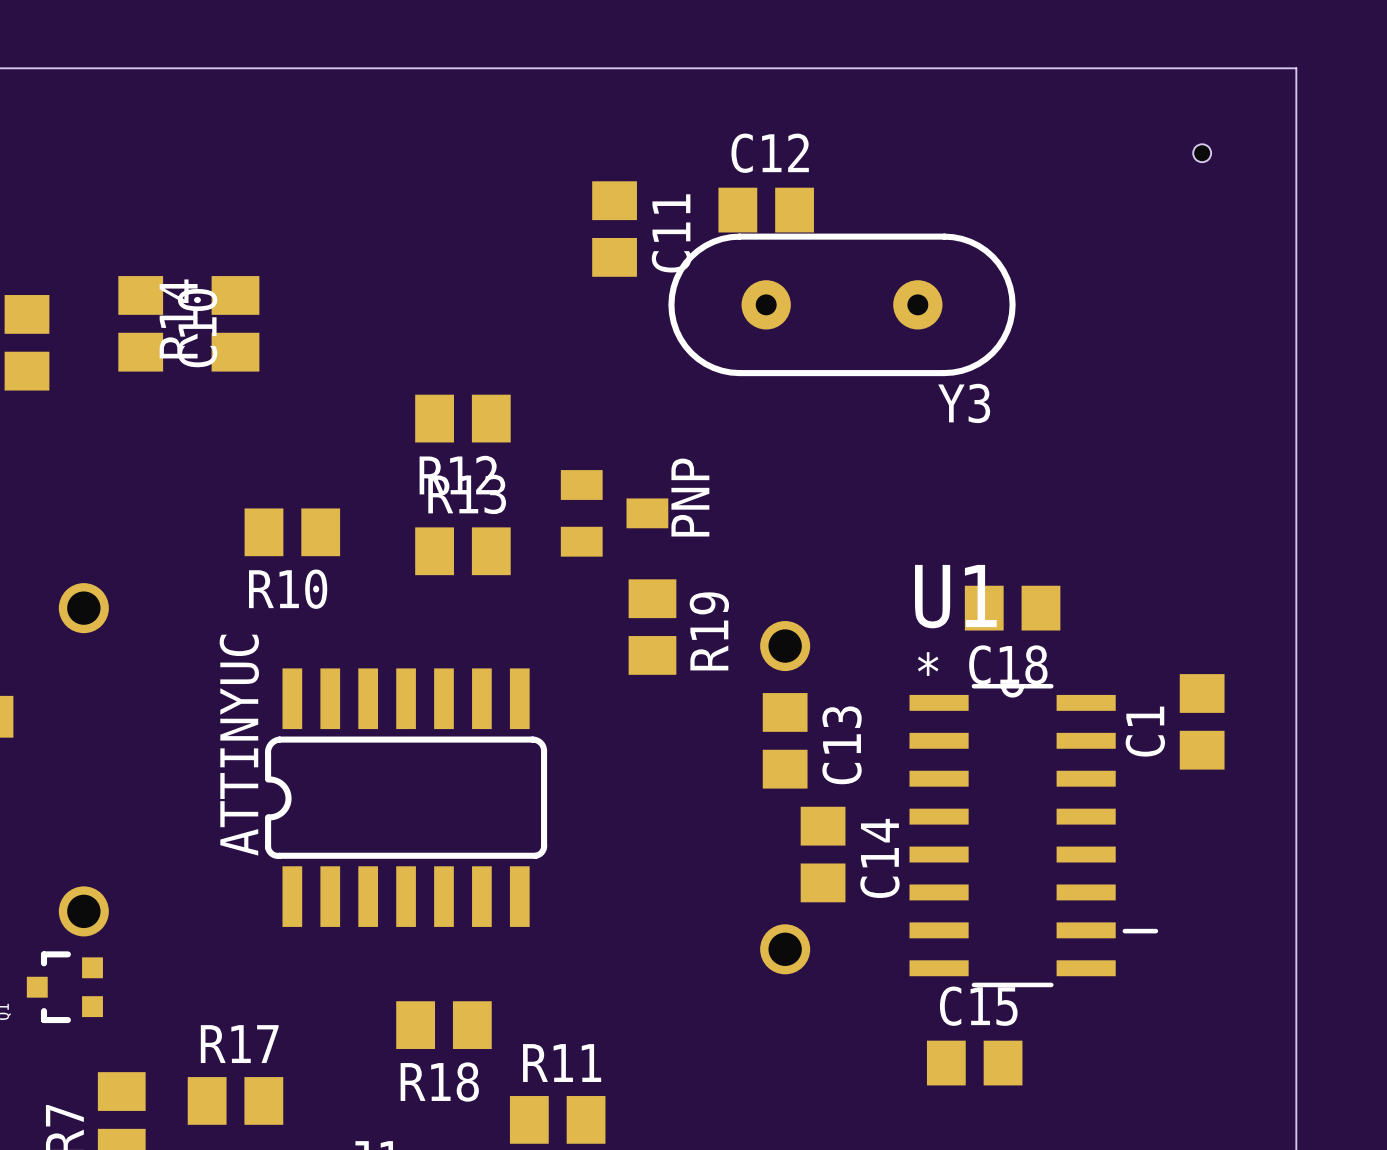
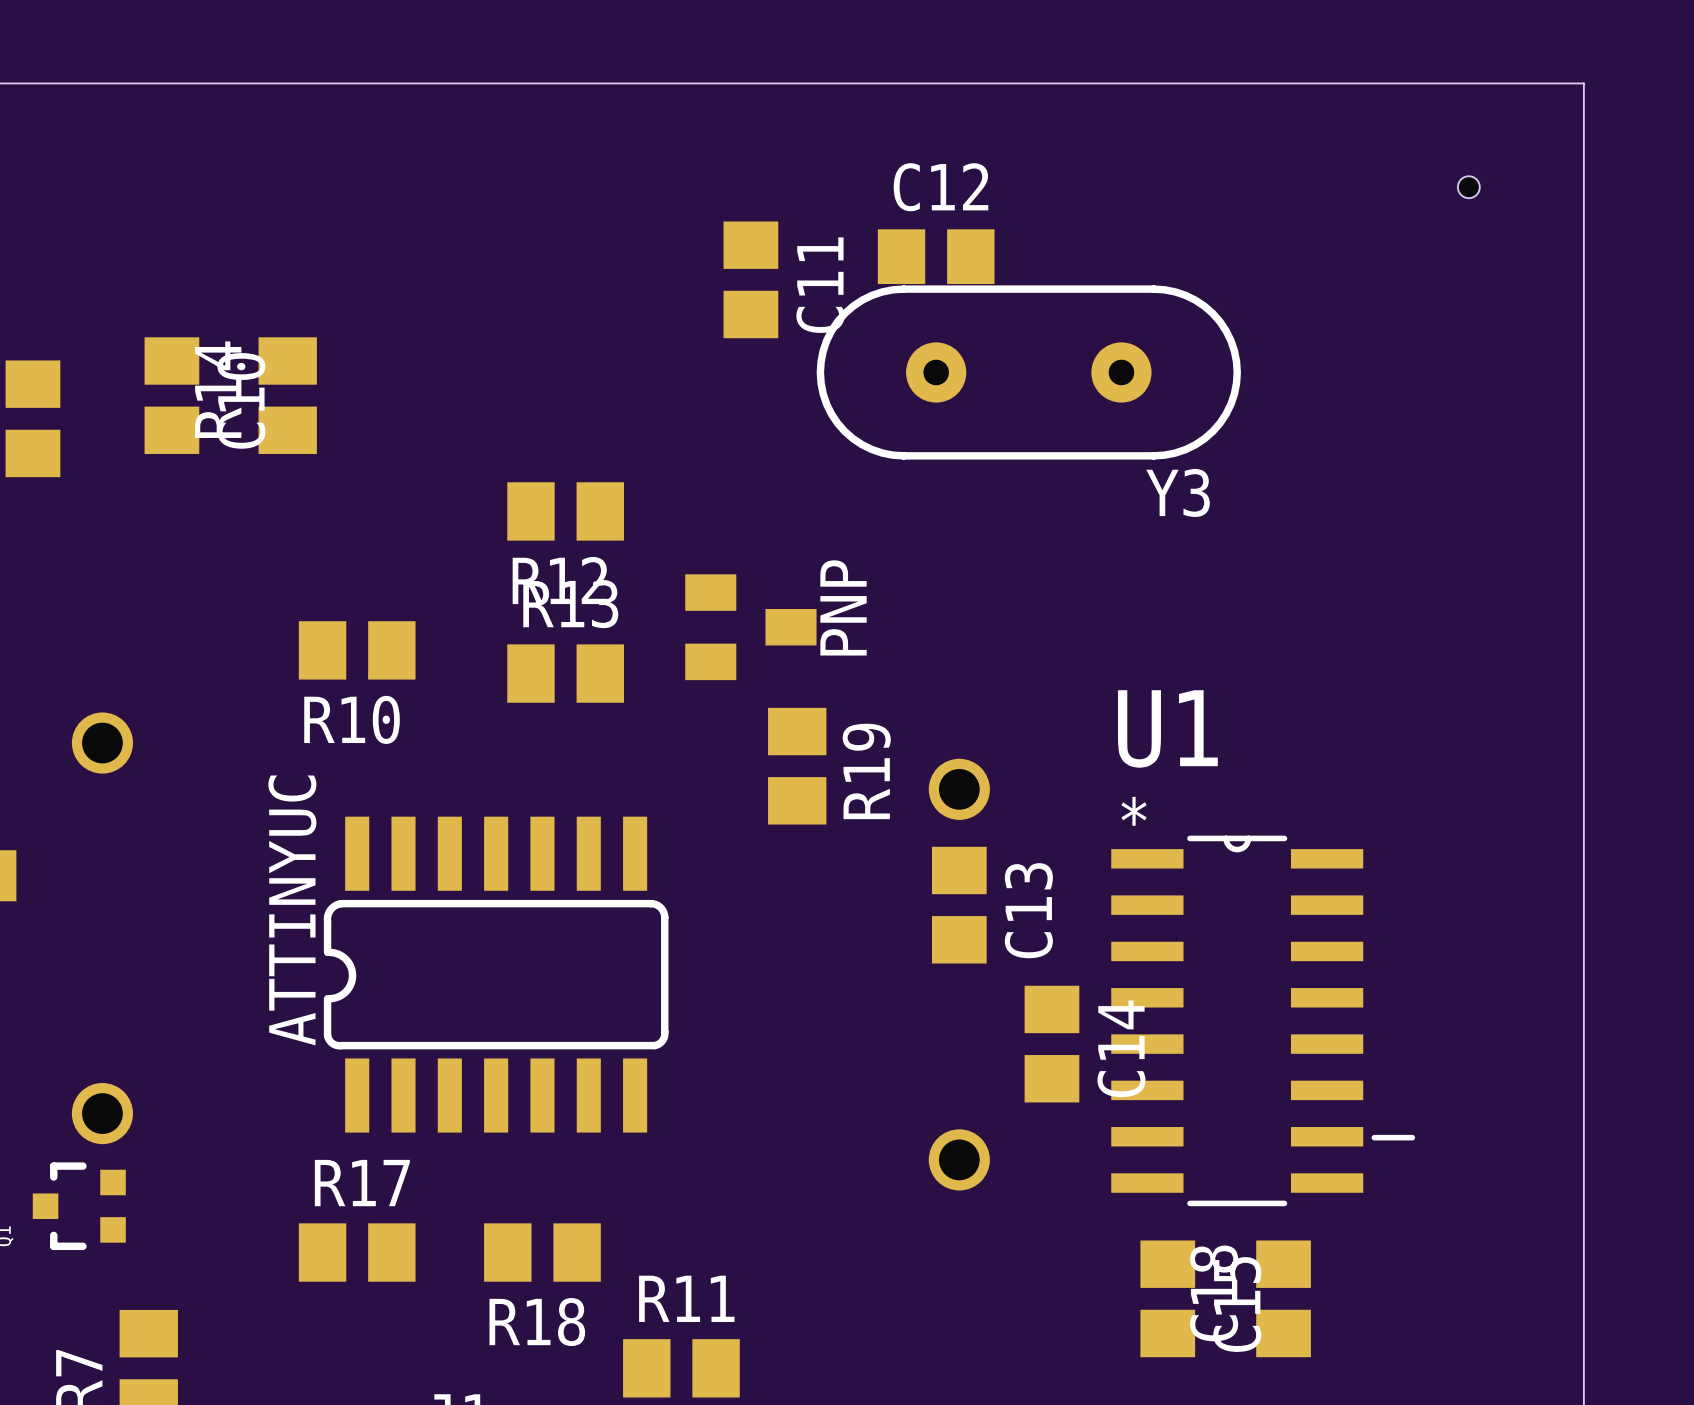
C18 rotation: 0° (1012, 608) -> 90° clockwise (1283, 1298)
C18 position: (1012, 608) -> (1283, 1298)
C1: (1202, 721) -> none
C14 position: (823, 854) -> (1051, 1044)
C15 rotation: 0° (974, 1063) -> 90° clockwise (1167, 1298)
R17 position: (235, 1100) -> (357, 1252)

